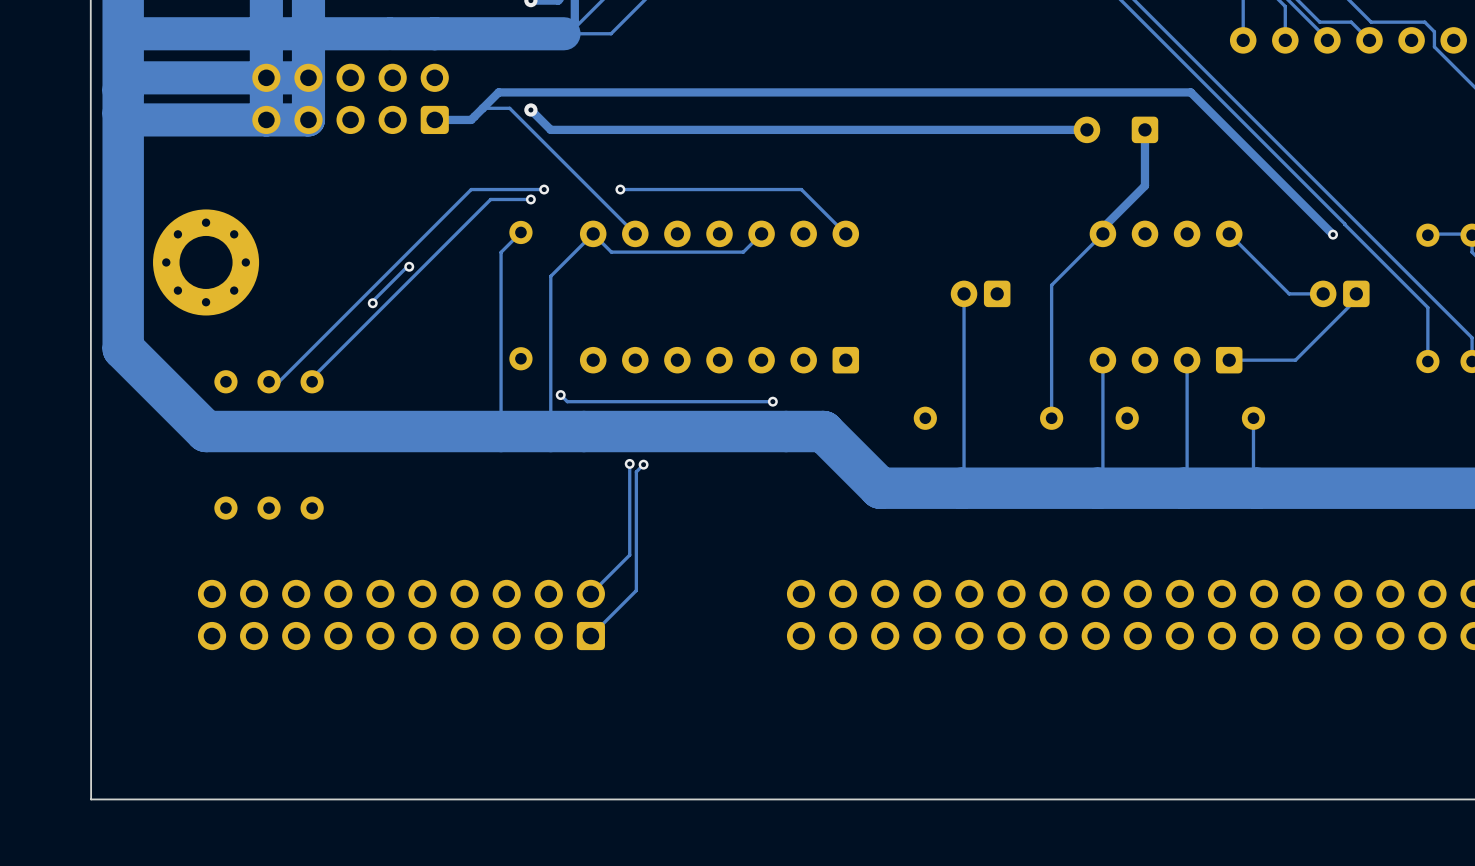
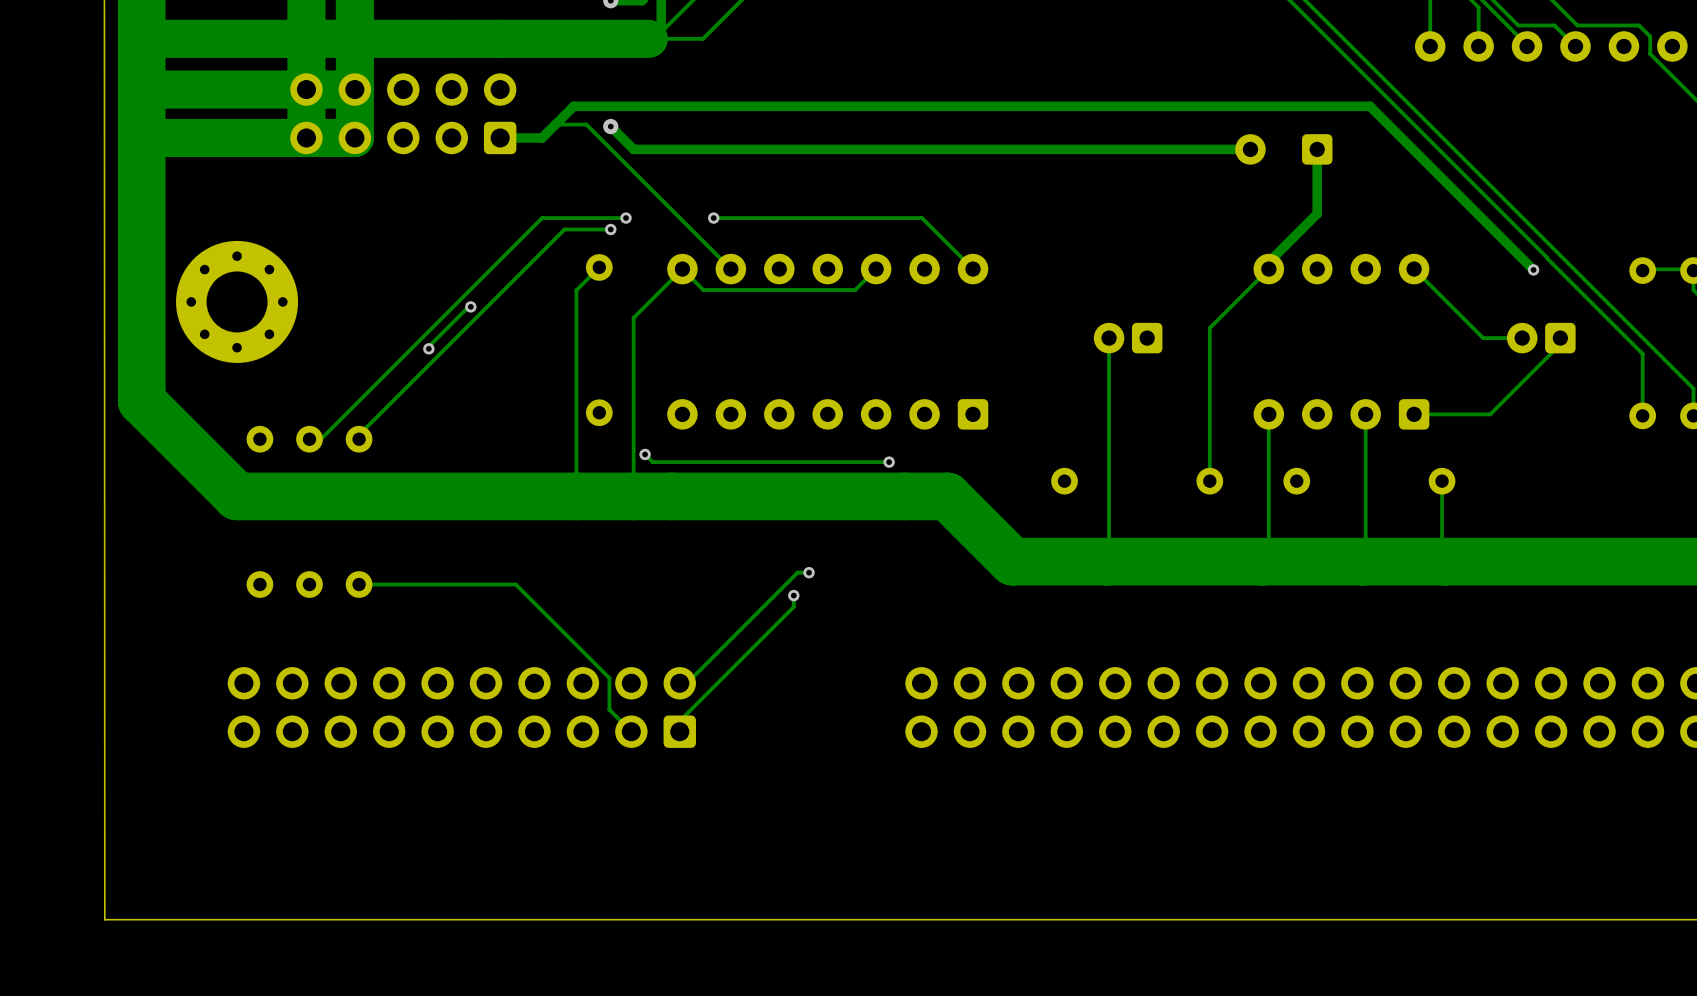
track: (629, 463) (629, 555) (590, 593) -> (809, 572) (797, 572) (687, 683) (679, 683)
via: (629, 463) -> none
track: (643, 464) (636, 471) (636, 590) (590, 636) -> (793, 595) (793, 607) (679, 721) (679, 731)
via: (643, 464) -> none
via: none -> (809, 572)
track: none -> (359, 584) (515, 584) (609, 678) (609, 709) (631, 731)
via: none -> (793, 595)

